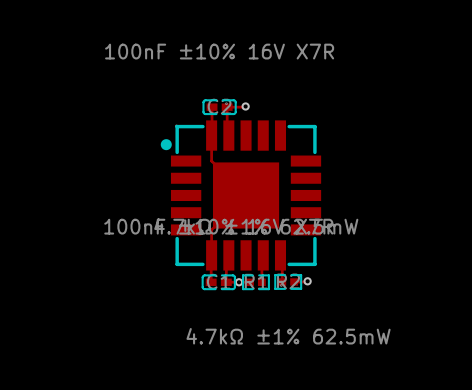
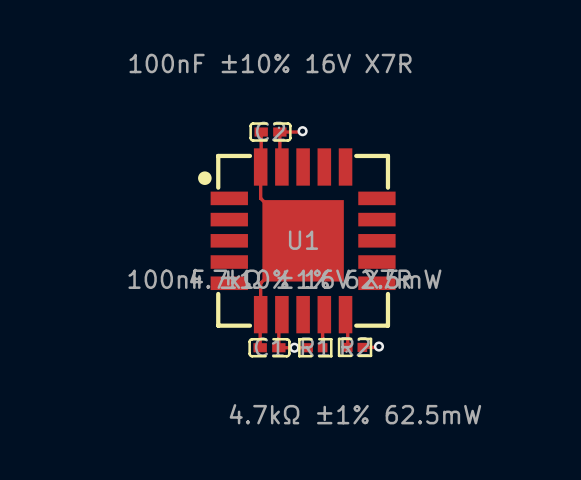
U1 name: none -> U1 (303, 240)

